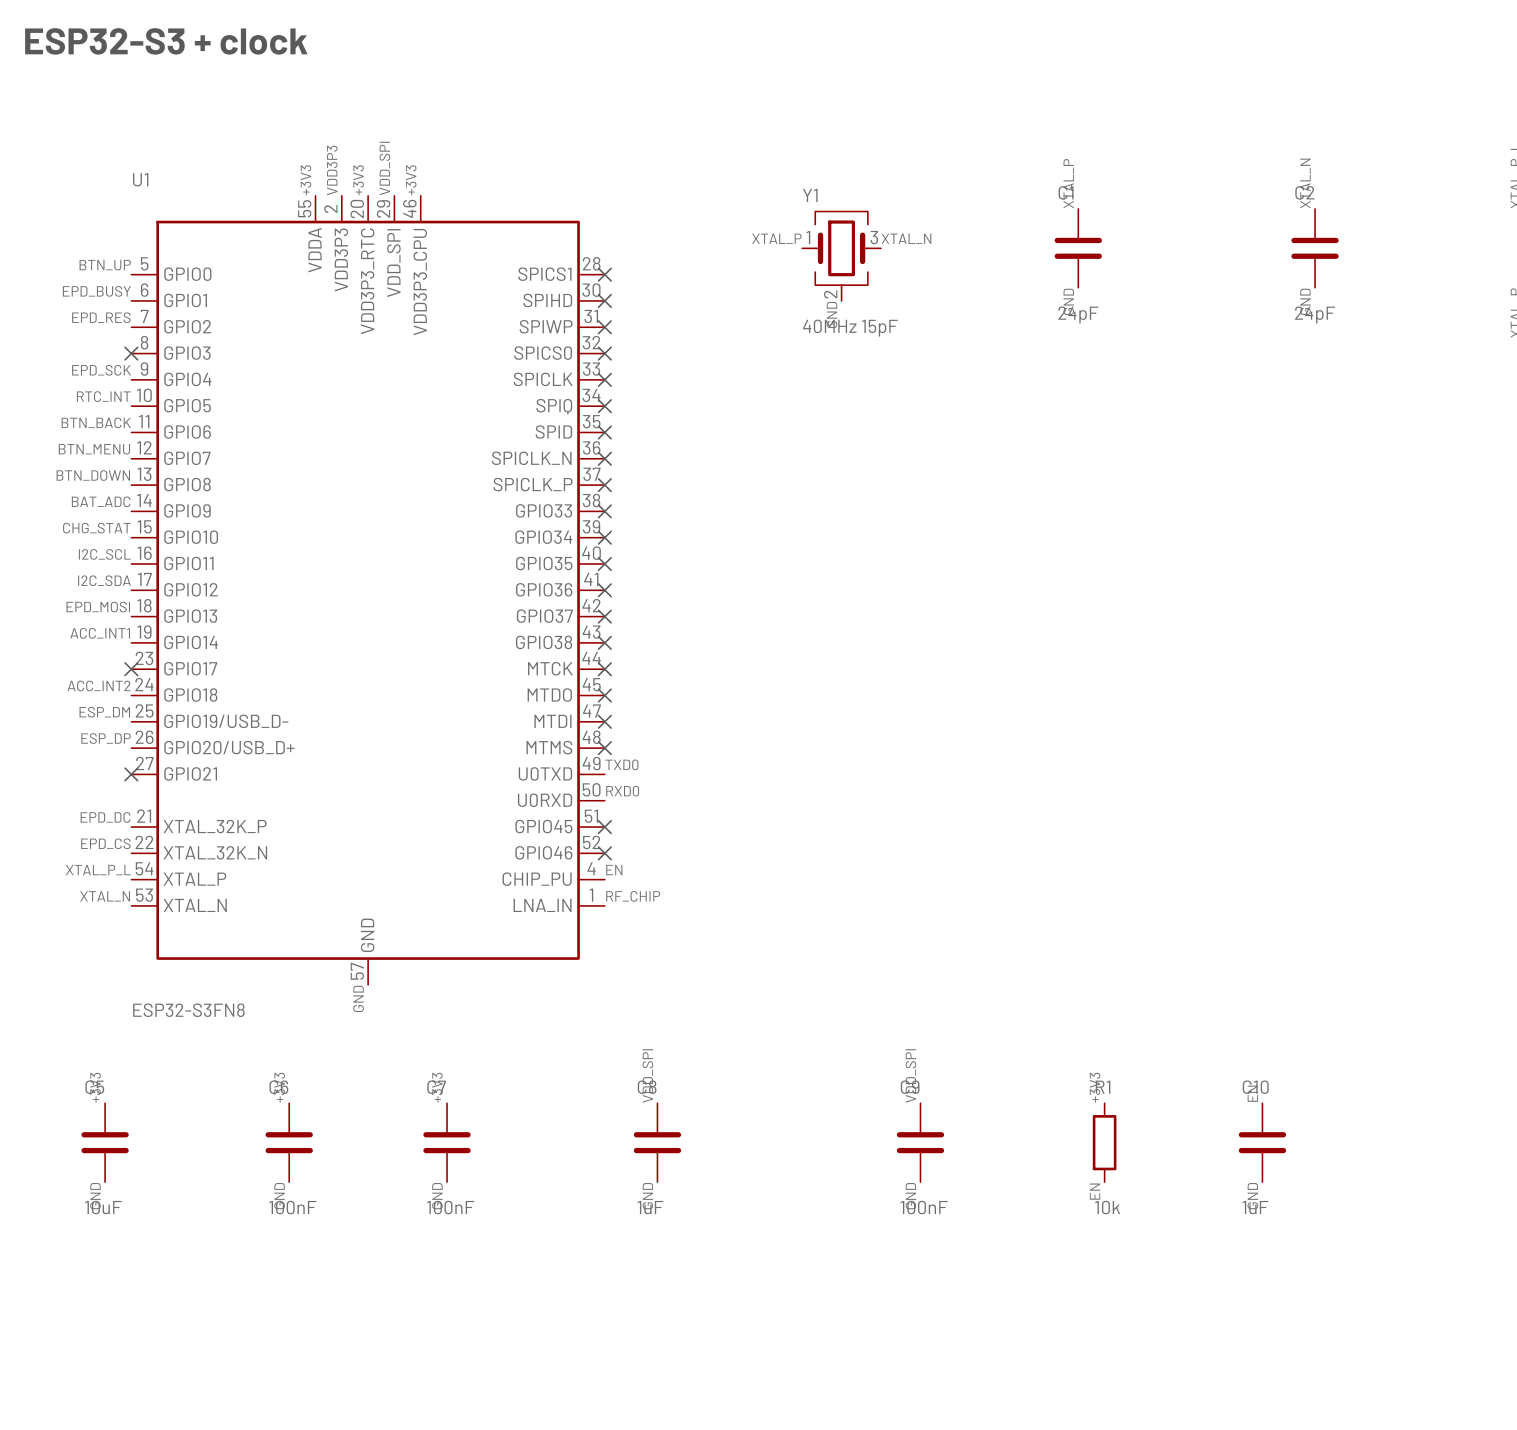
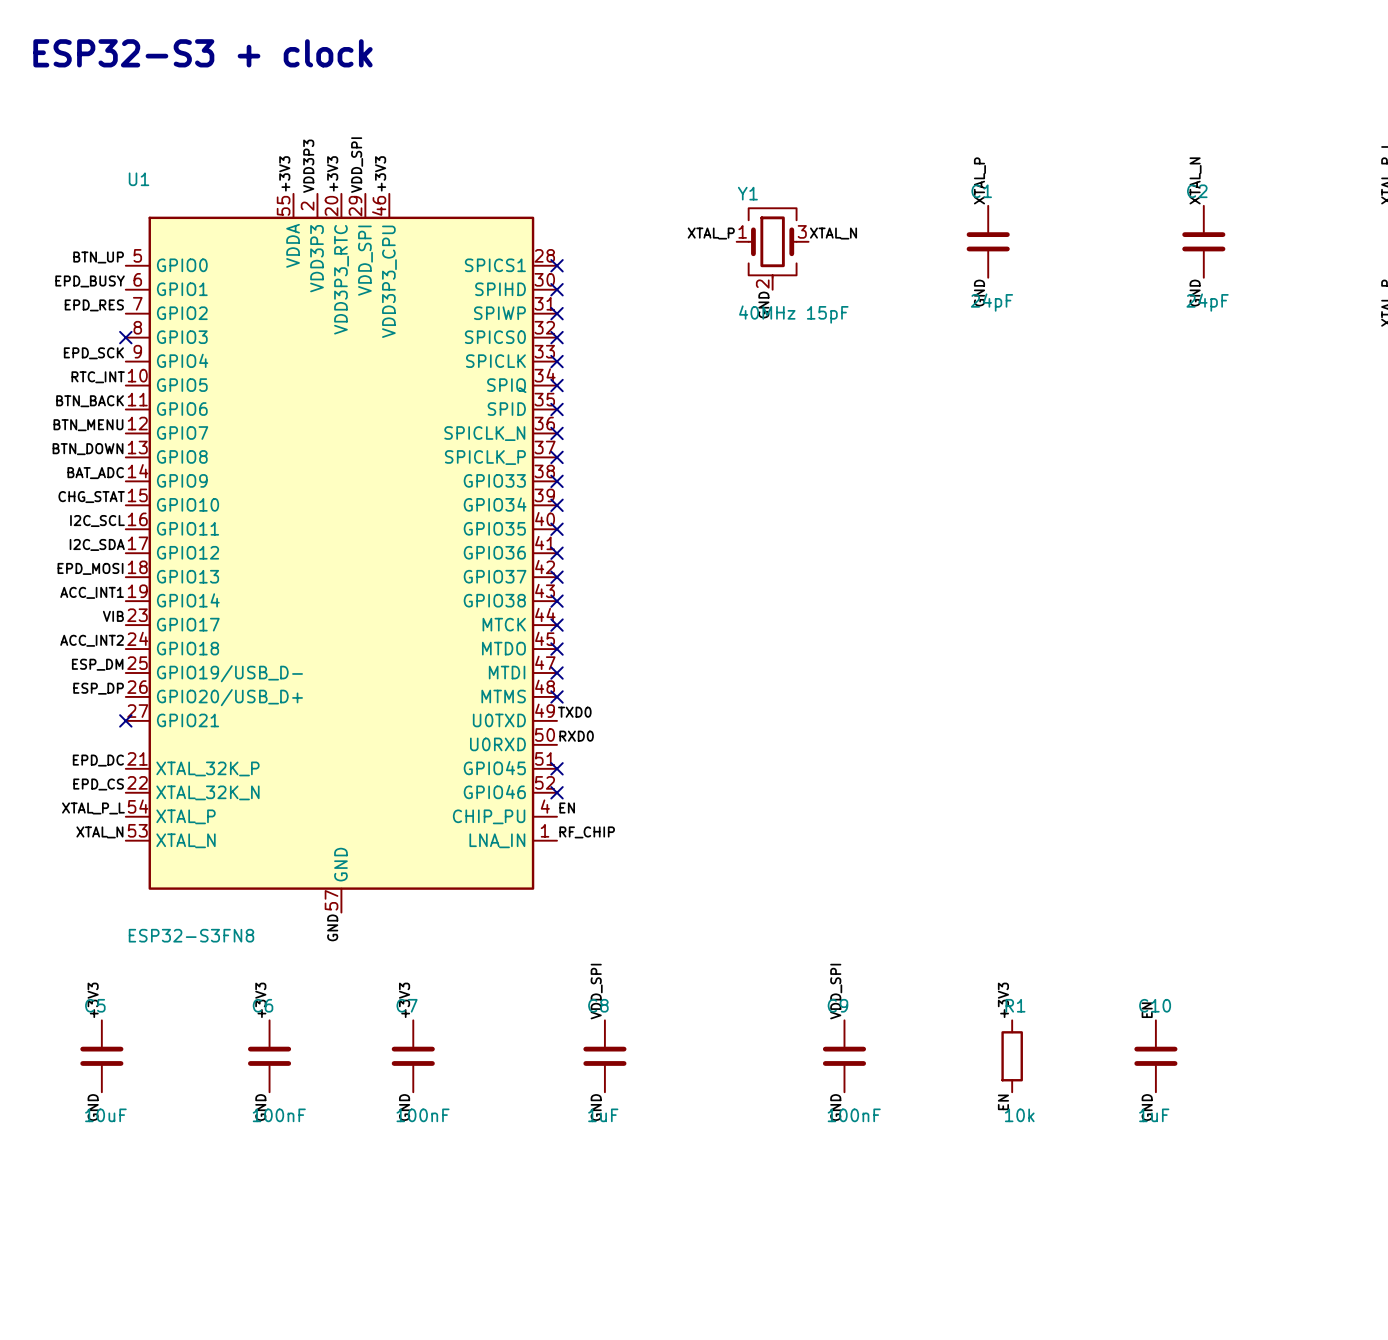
label: none -> VIB (113, 616)
no-connect mark: (131, 669) -> none

